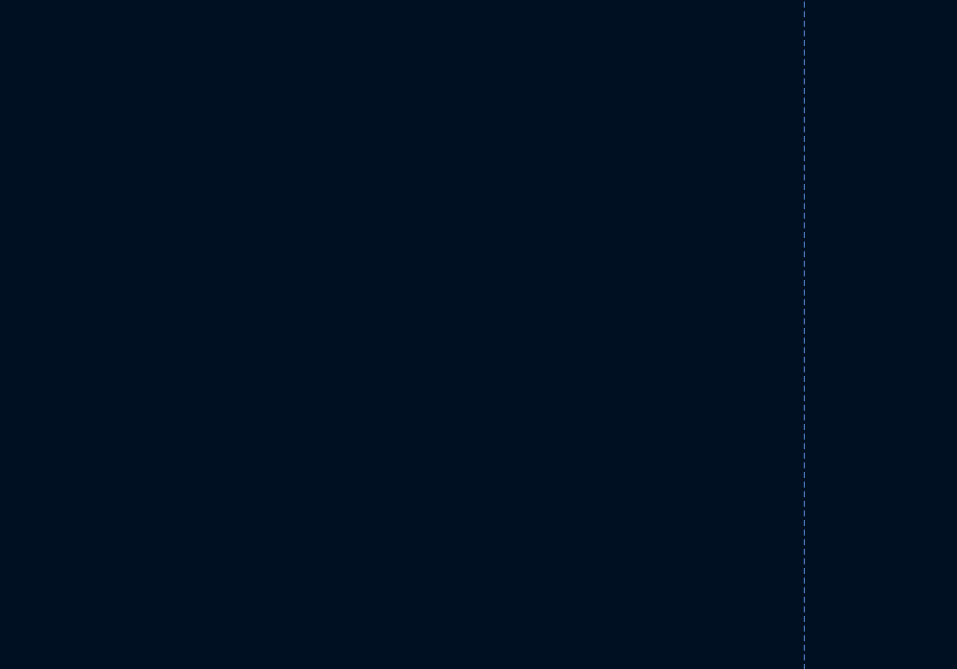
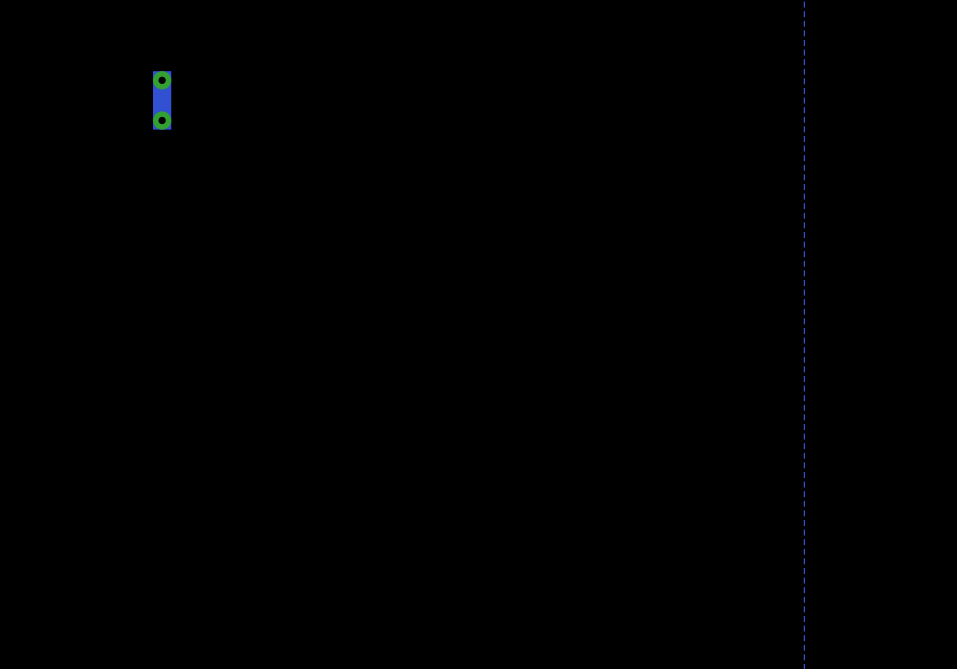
part: none -> (162, 100)

